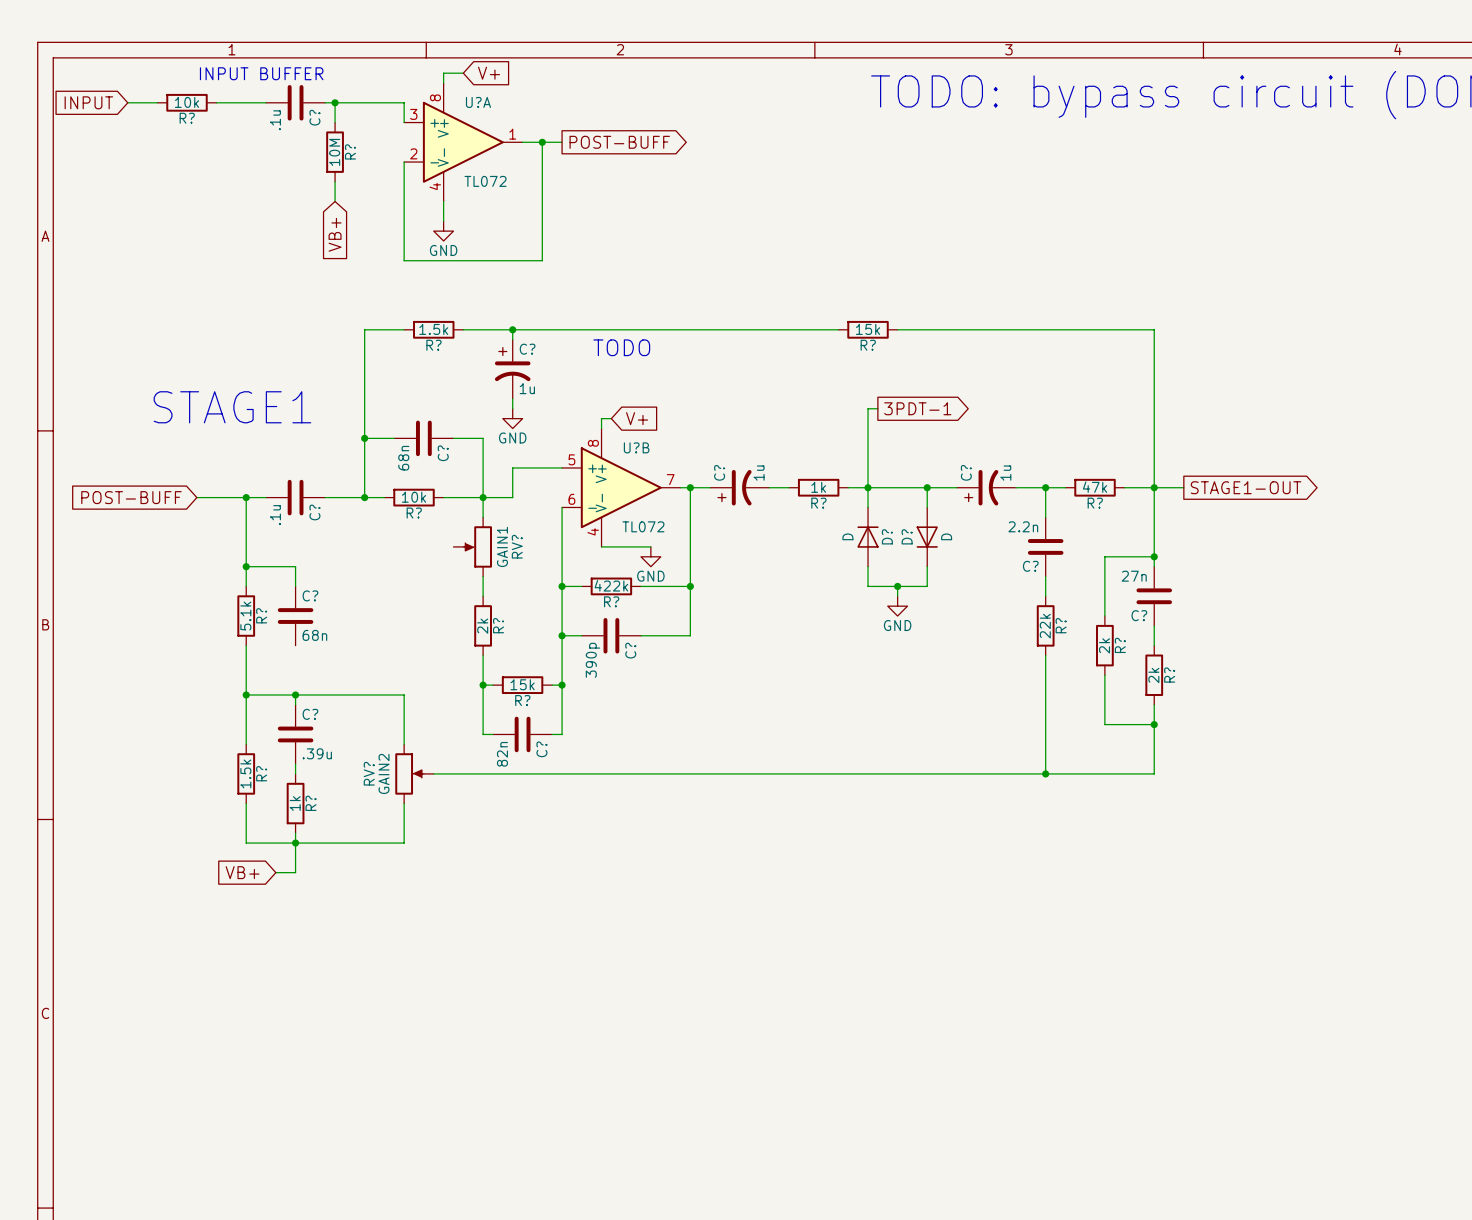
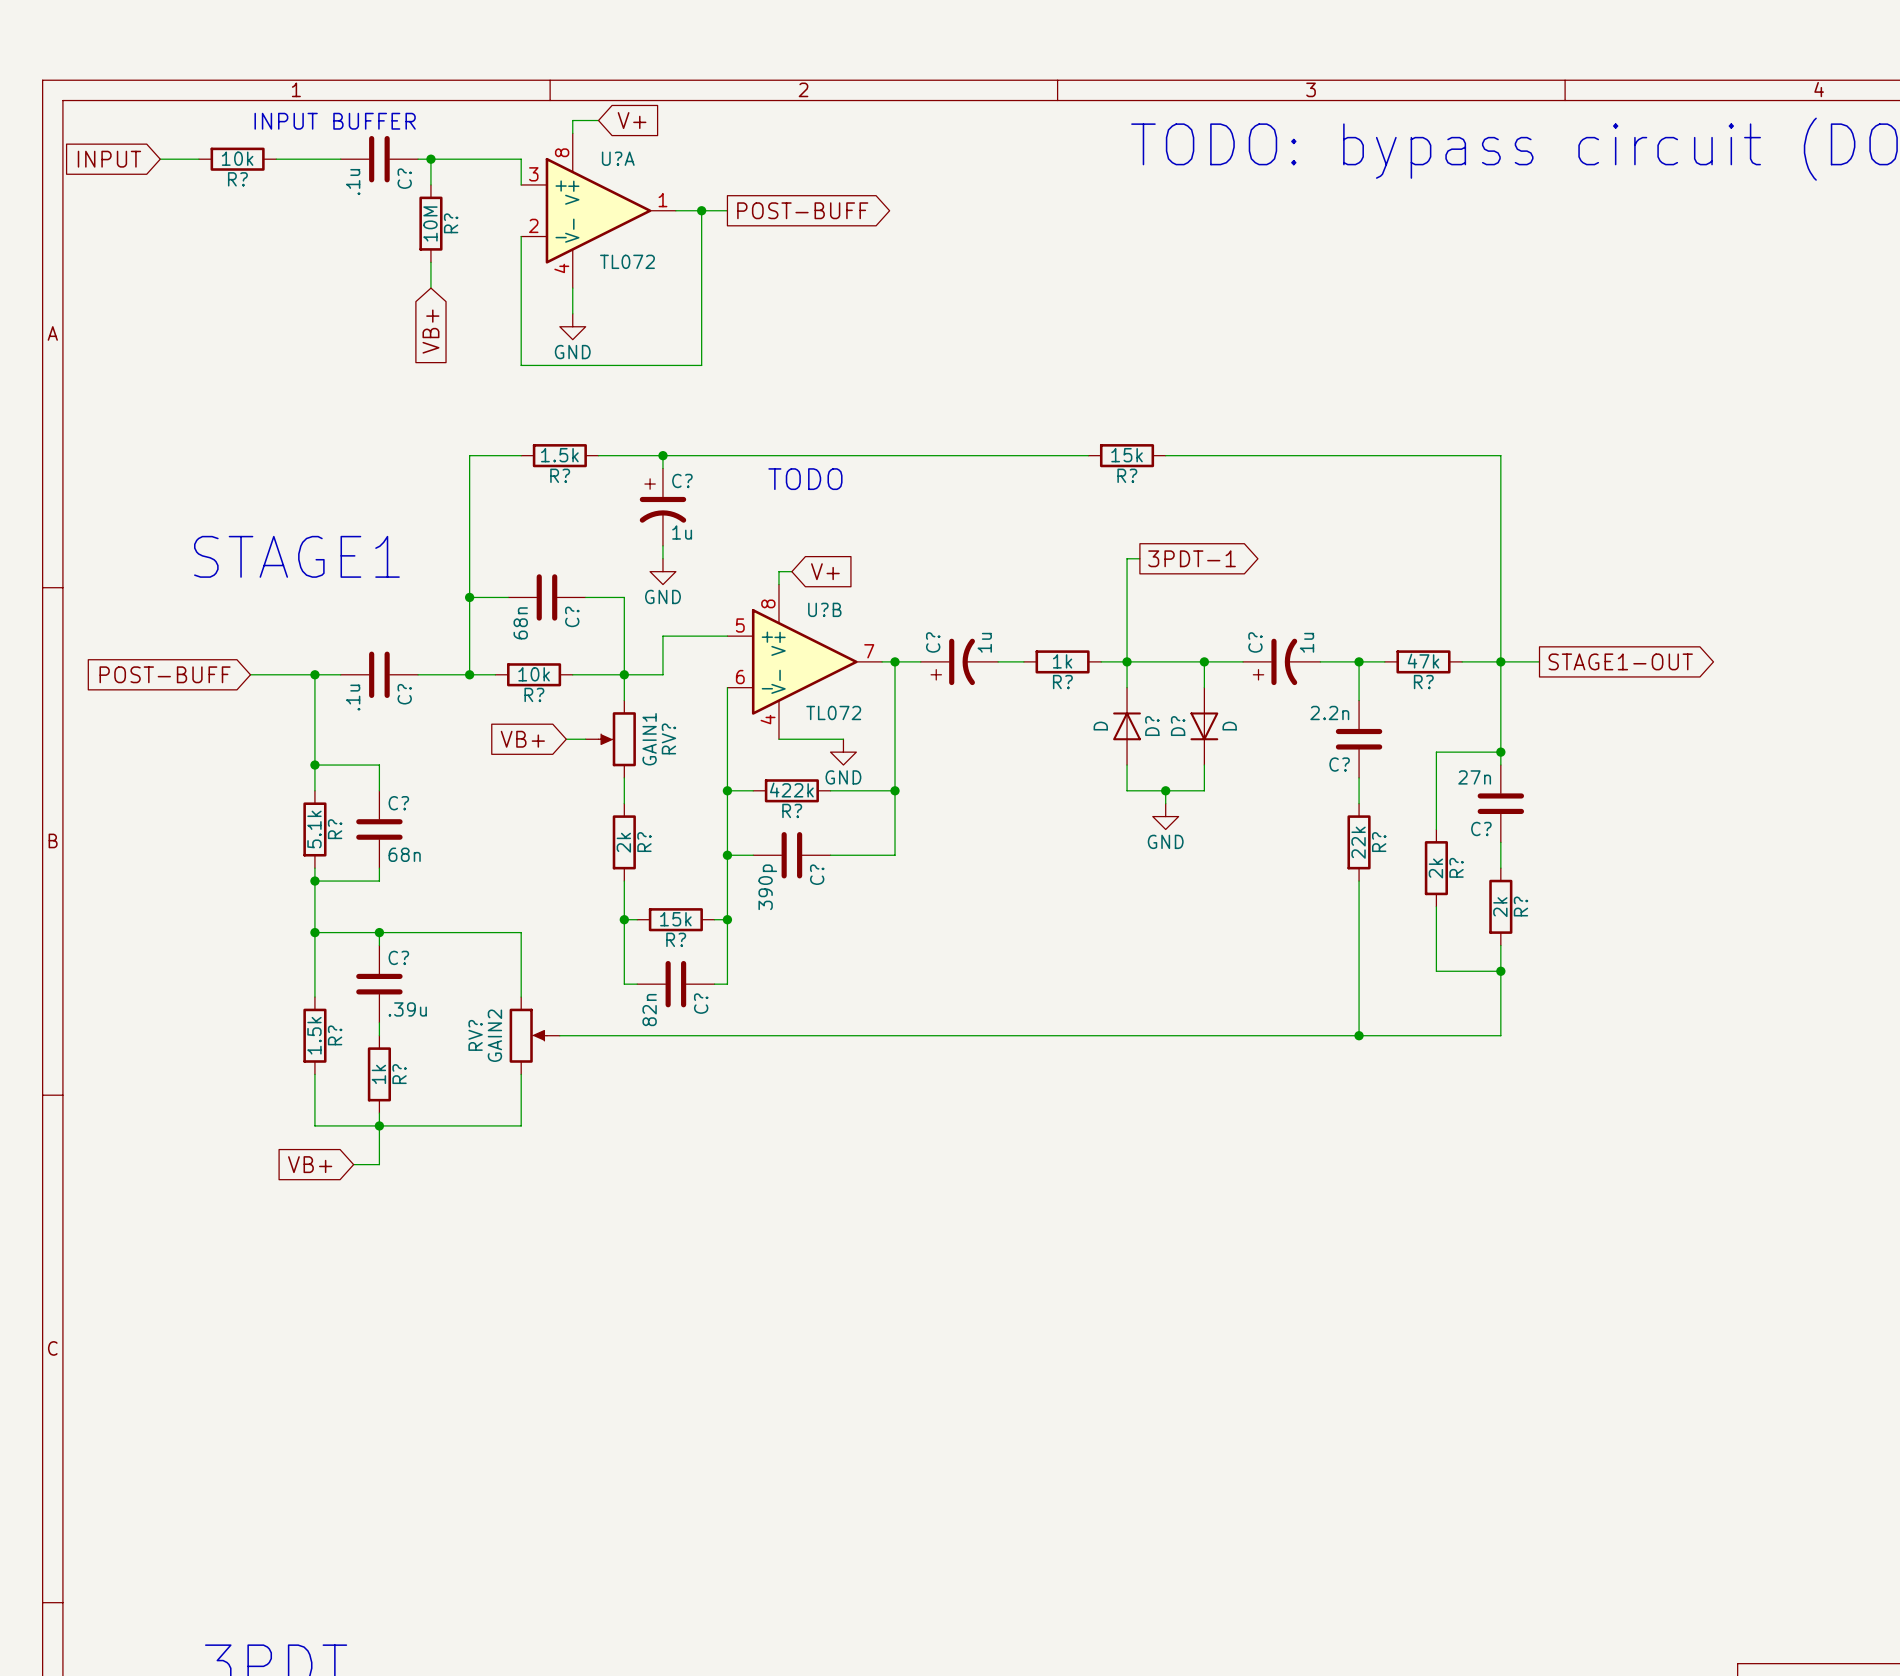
global label: none -> VB+ (522, 739)
wire: none -> (566, 739) (585, 739)
wire: none -> (379, 868) (379, 881) (314, 881)
junction: none -> (314, 881)

